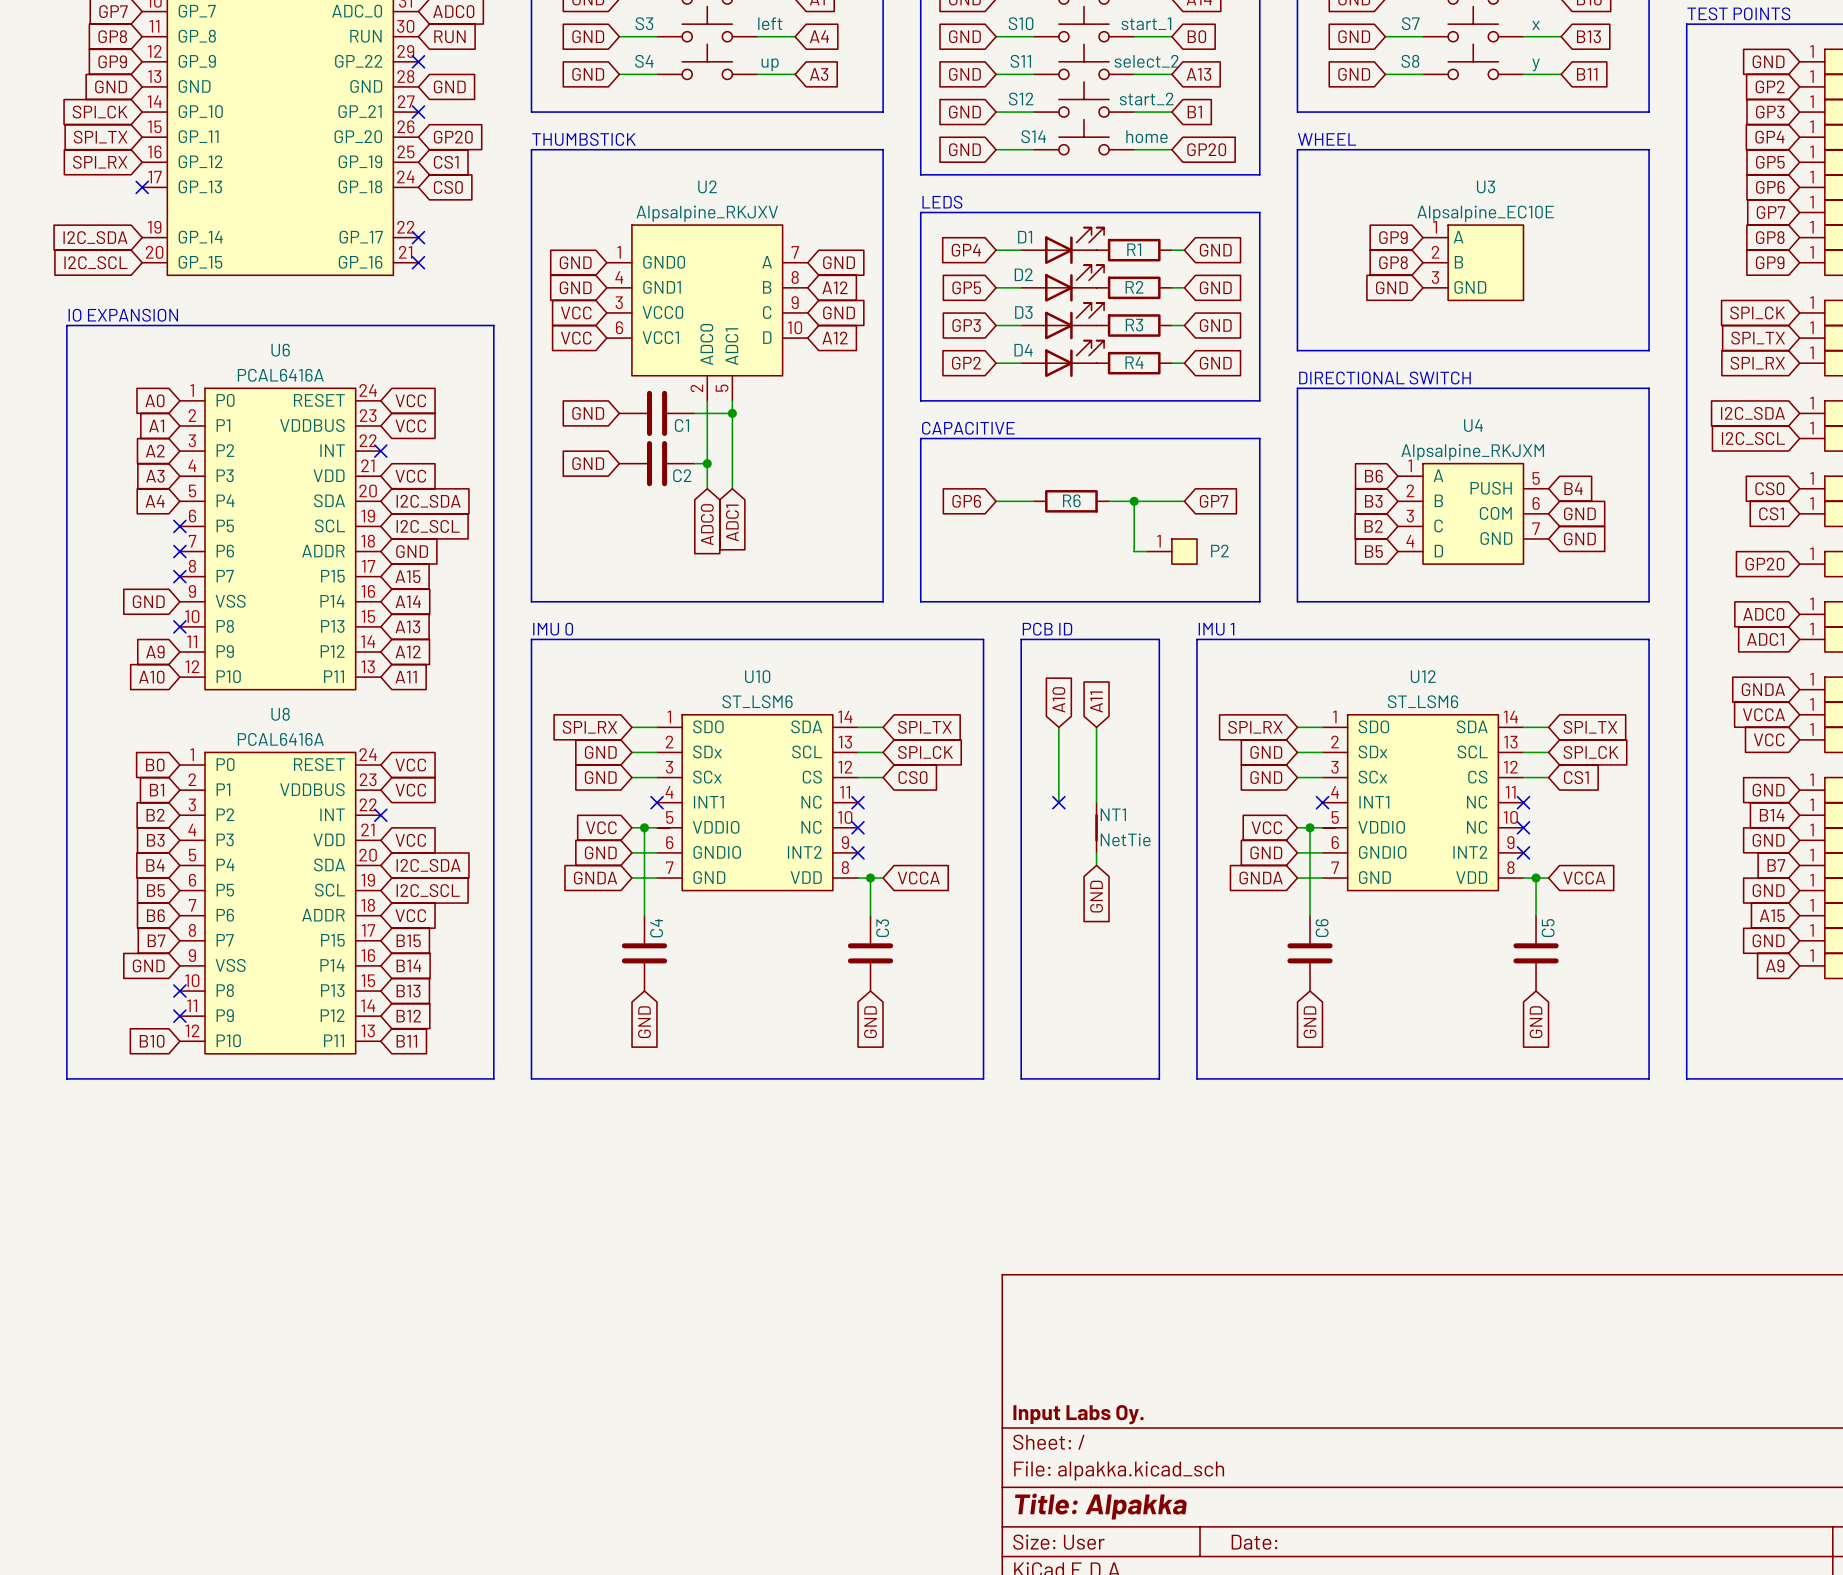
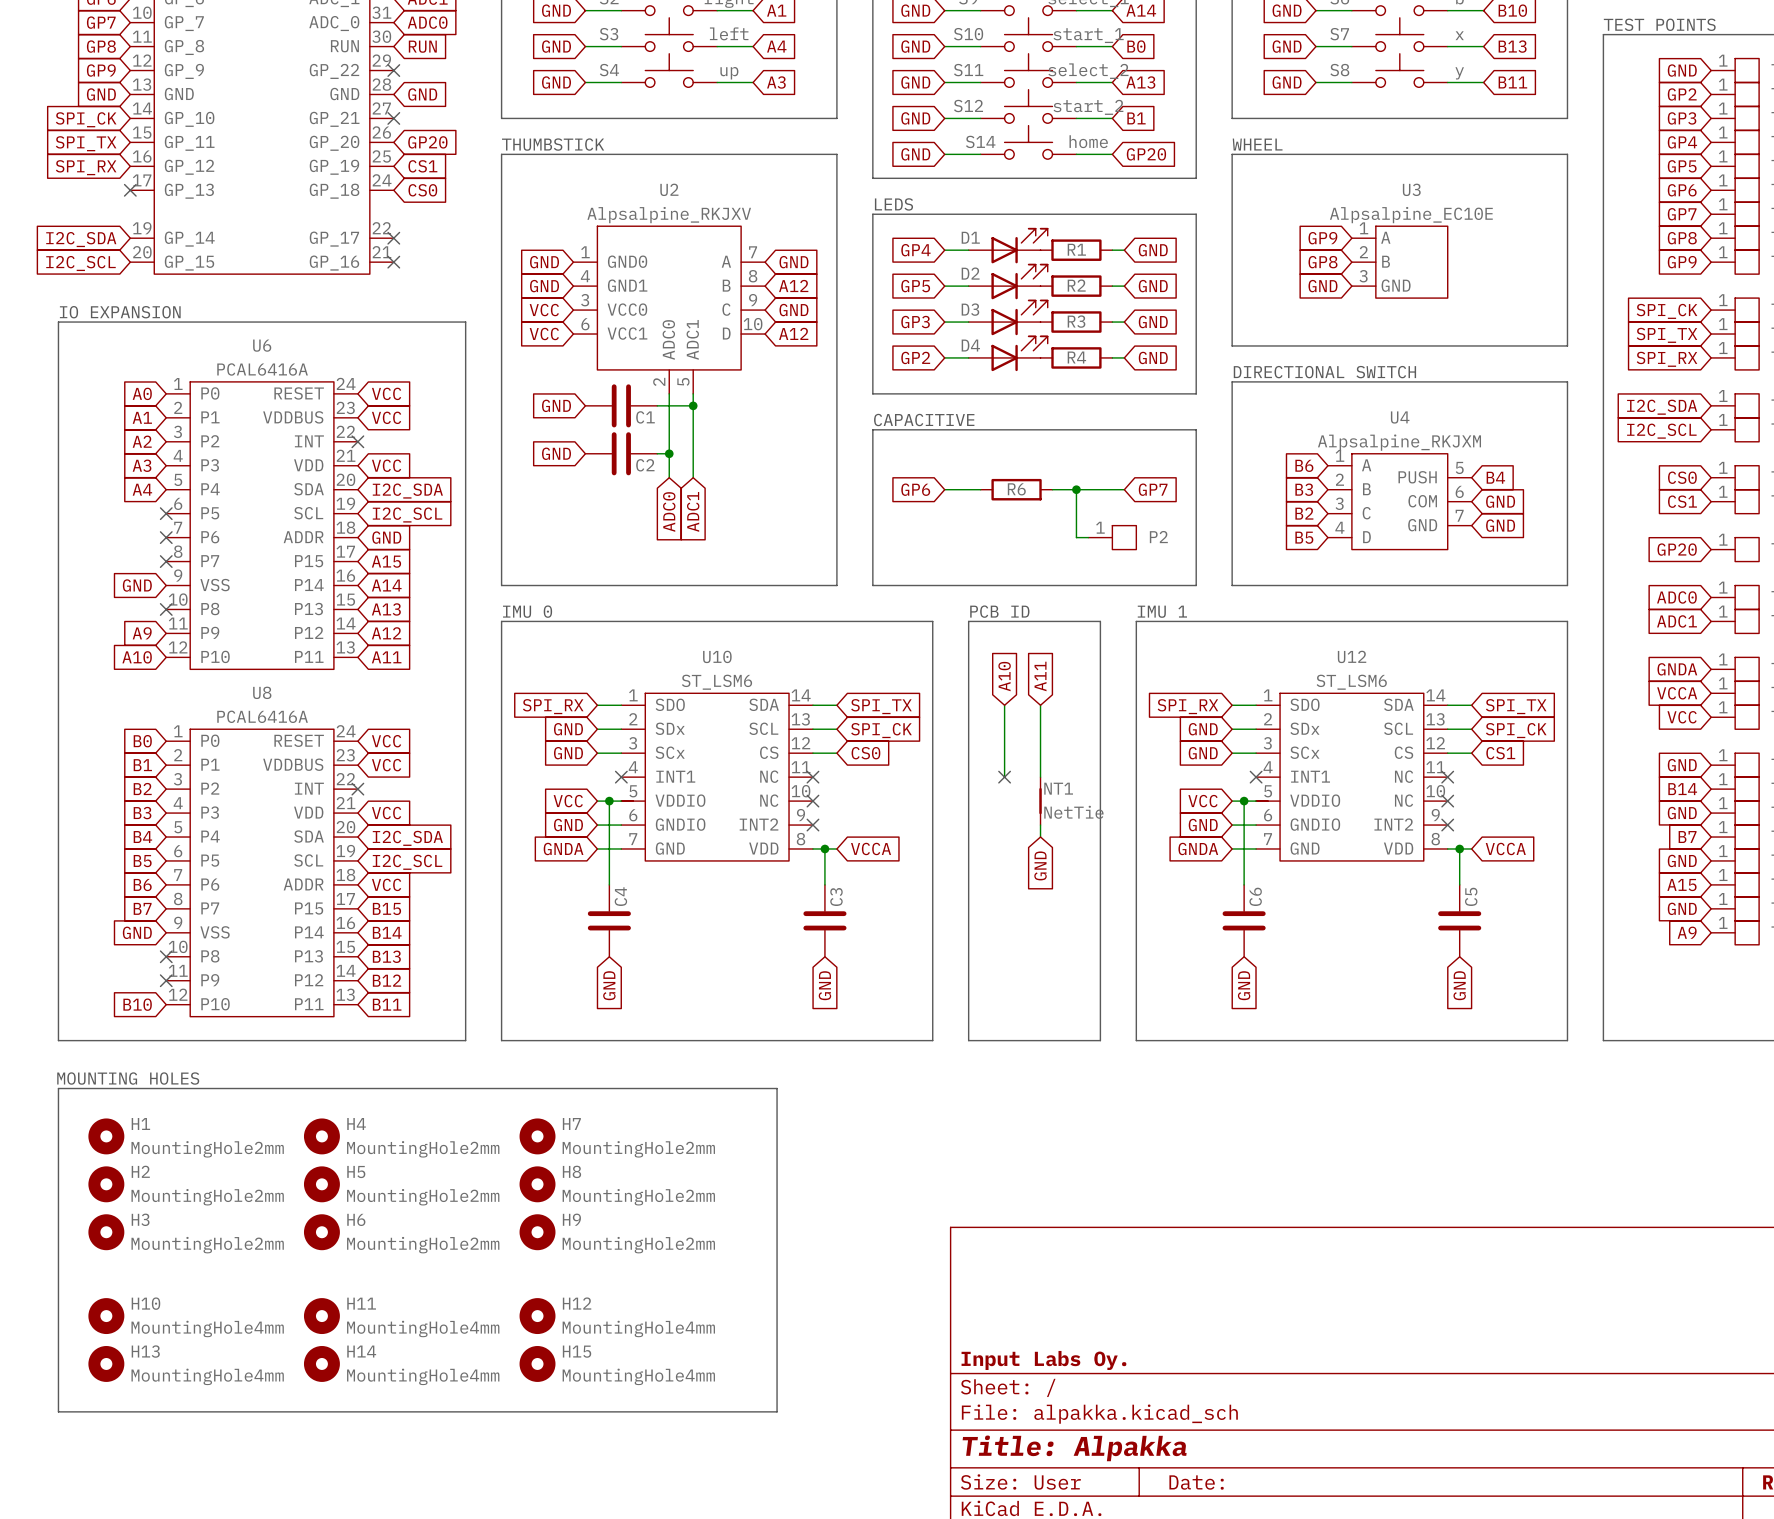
text: none -> MOUNTING HOLES (128, 1078)
line: none -> (58, 1088) (777, 1088) (777, 1411) (58, 1411) (58, 1088)
H1: none -> MountingHole2mm (106, 1136)
H4: none -> MountingHole2mm (321, 1136)
H7: none -> MountingHole2mm (537, 1136)
H2: none -> MountingHole2mm (106, 1184)
H5: none -> MountingHole2mm (321, 1184)
H8: none -> MountingHole2mm (537, 1184)
H3: none -> MountingHole2mm (106, 1232)
H6: none -> MountingHole2mm (321, 1232)
H9: none -> MountingHole2mm (537, 1232)
H10: none -> MountingHole4mm (106, 1316)
H11: none -> MountingHole4mm (321, 1316)
H12: none -> MountingHole4mm (537, 1316)
H13: none -> MountingHole4mm (106, 1363)
H14: none -> MountingHole4mm (321, 1363)
H15: none -> MountingHole4mm (537, 1363)

